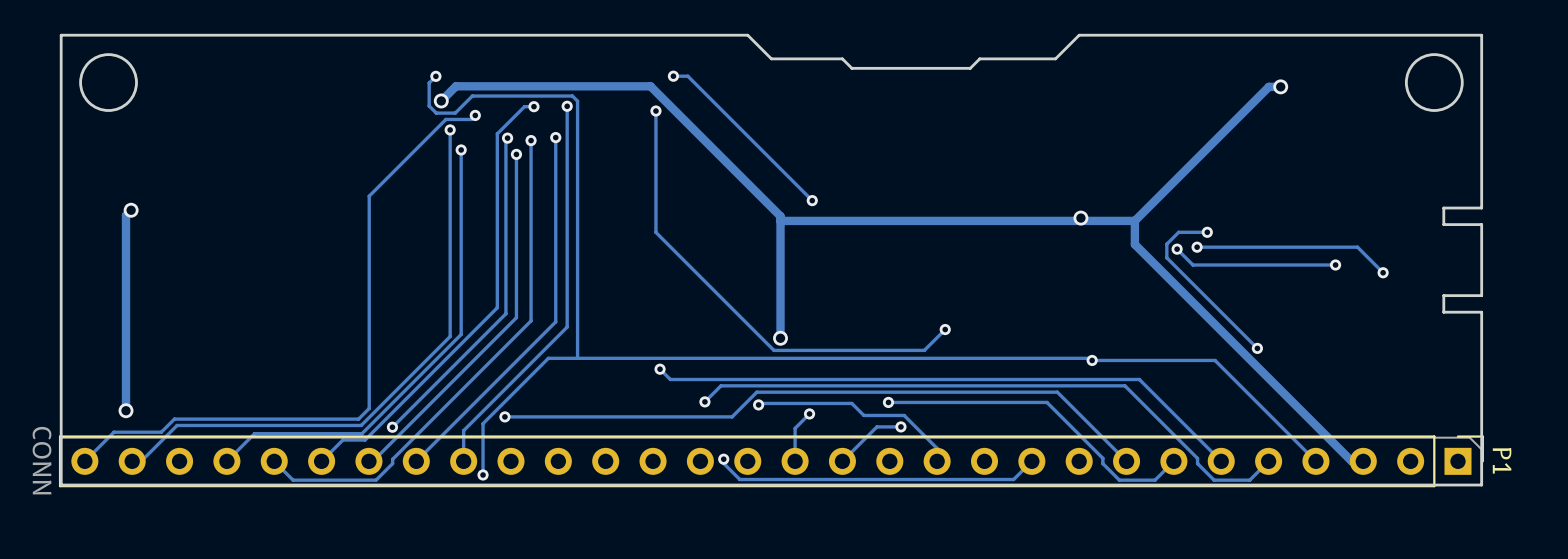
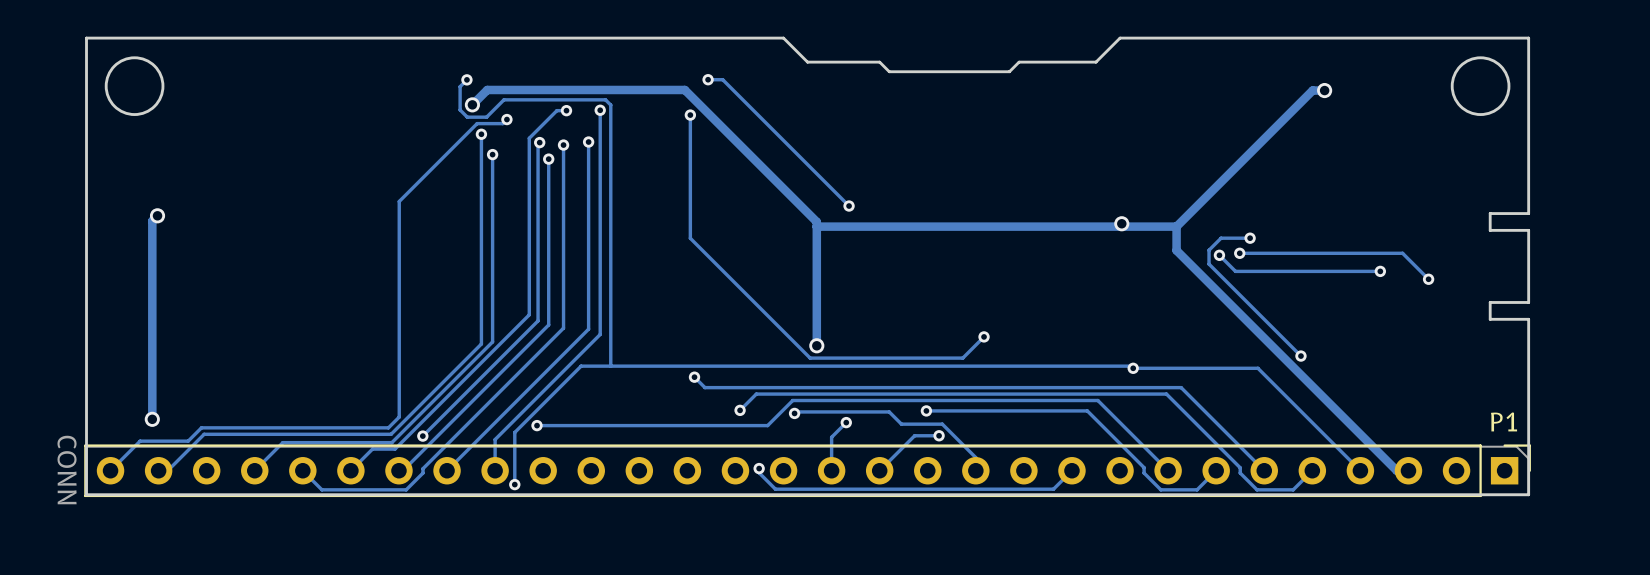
P1 name rotation: 0° (1502, 460) -> 90° counterclockwise (1504, 421)
P1 name position: P1 (1502, 460) -> P1 (1504, 421)

